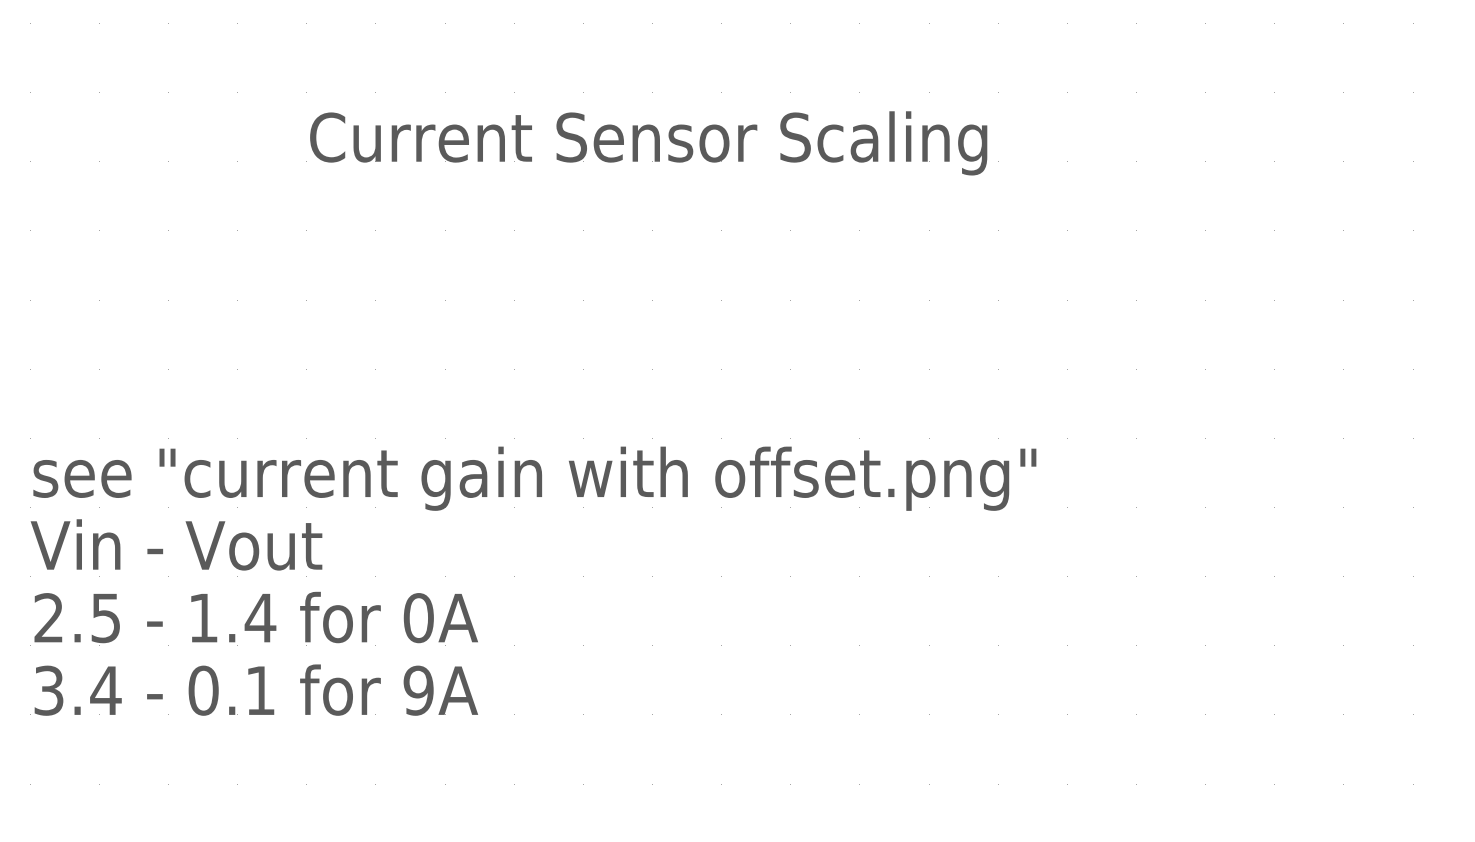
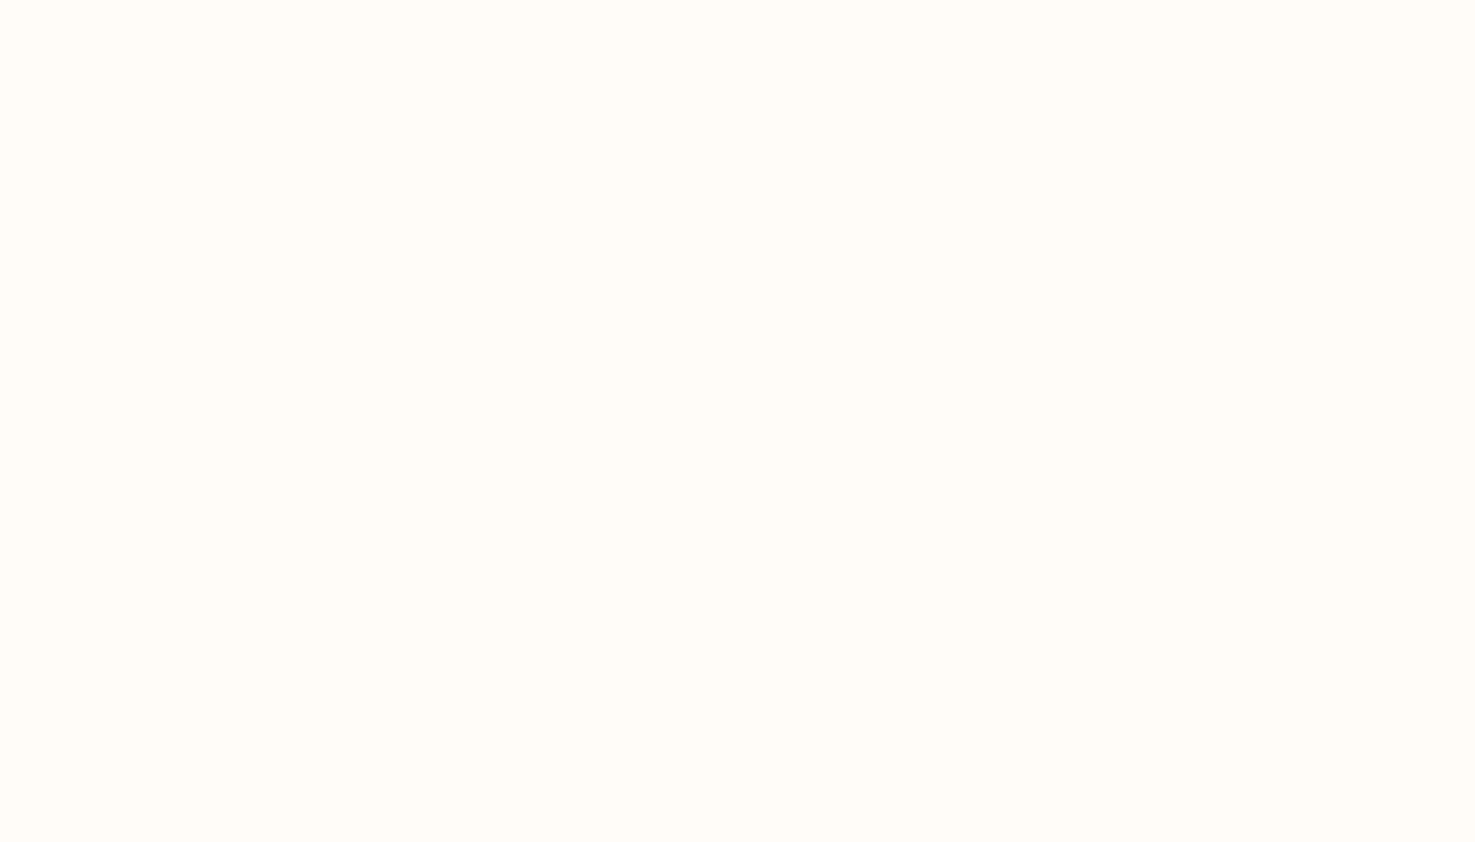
text: Current Sensor Scaling (648, 143) -> none
text: see "current gain with offset.png" (534, 478) -> none
text: Vin - Vout (176, 544) -> none
text: 2.5 - 1.4 for 0A (256, 617) -> none
text: 3.4 - 0.1 for 9A (256, 690) -> none

